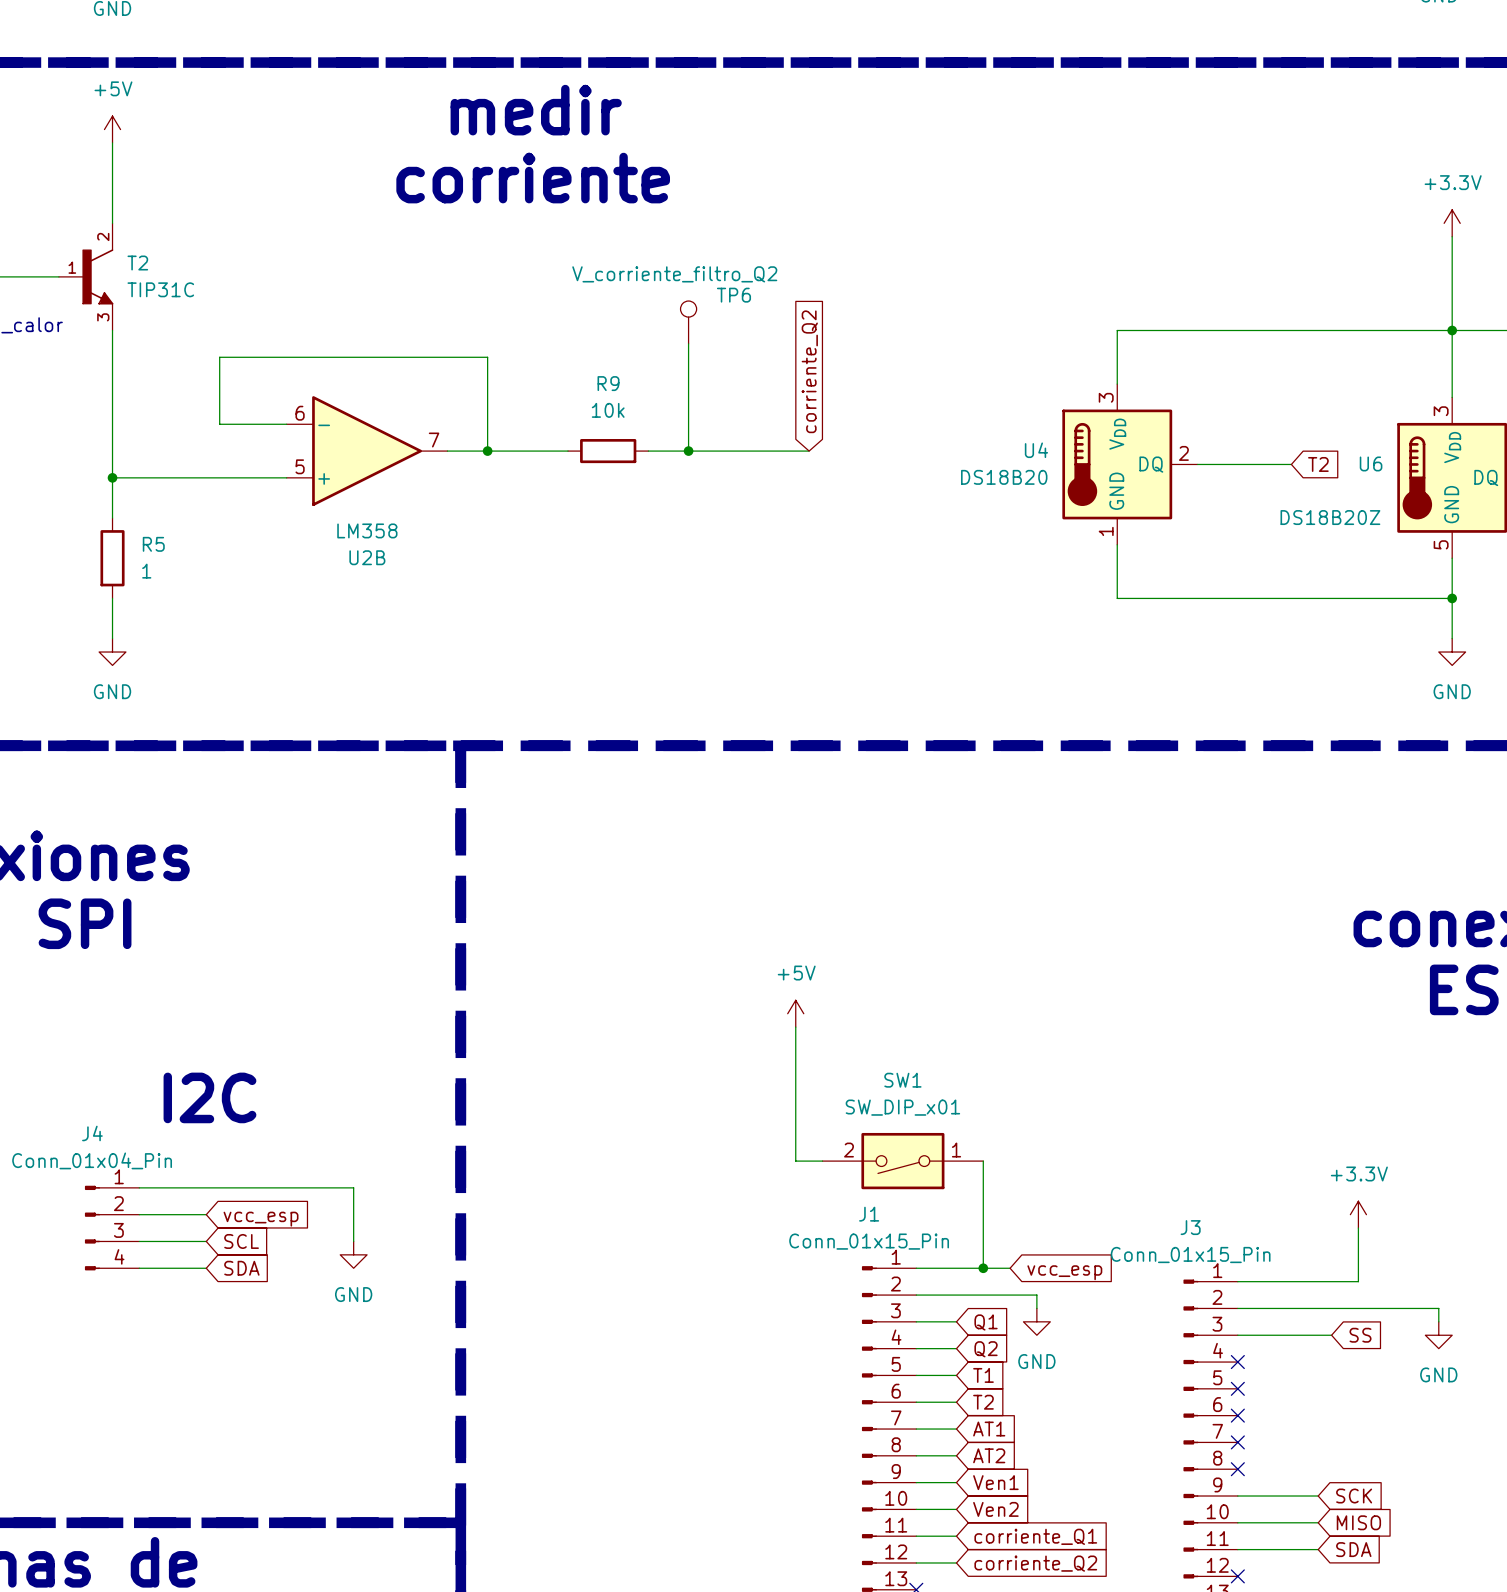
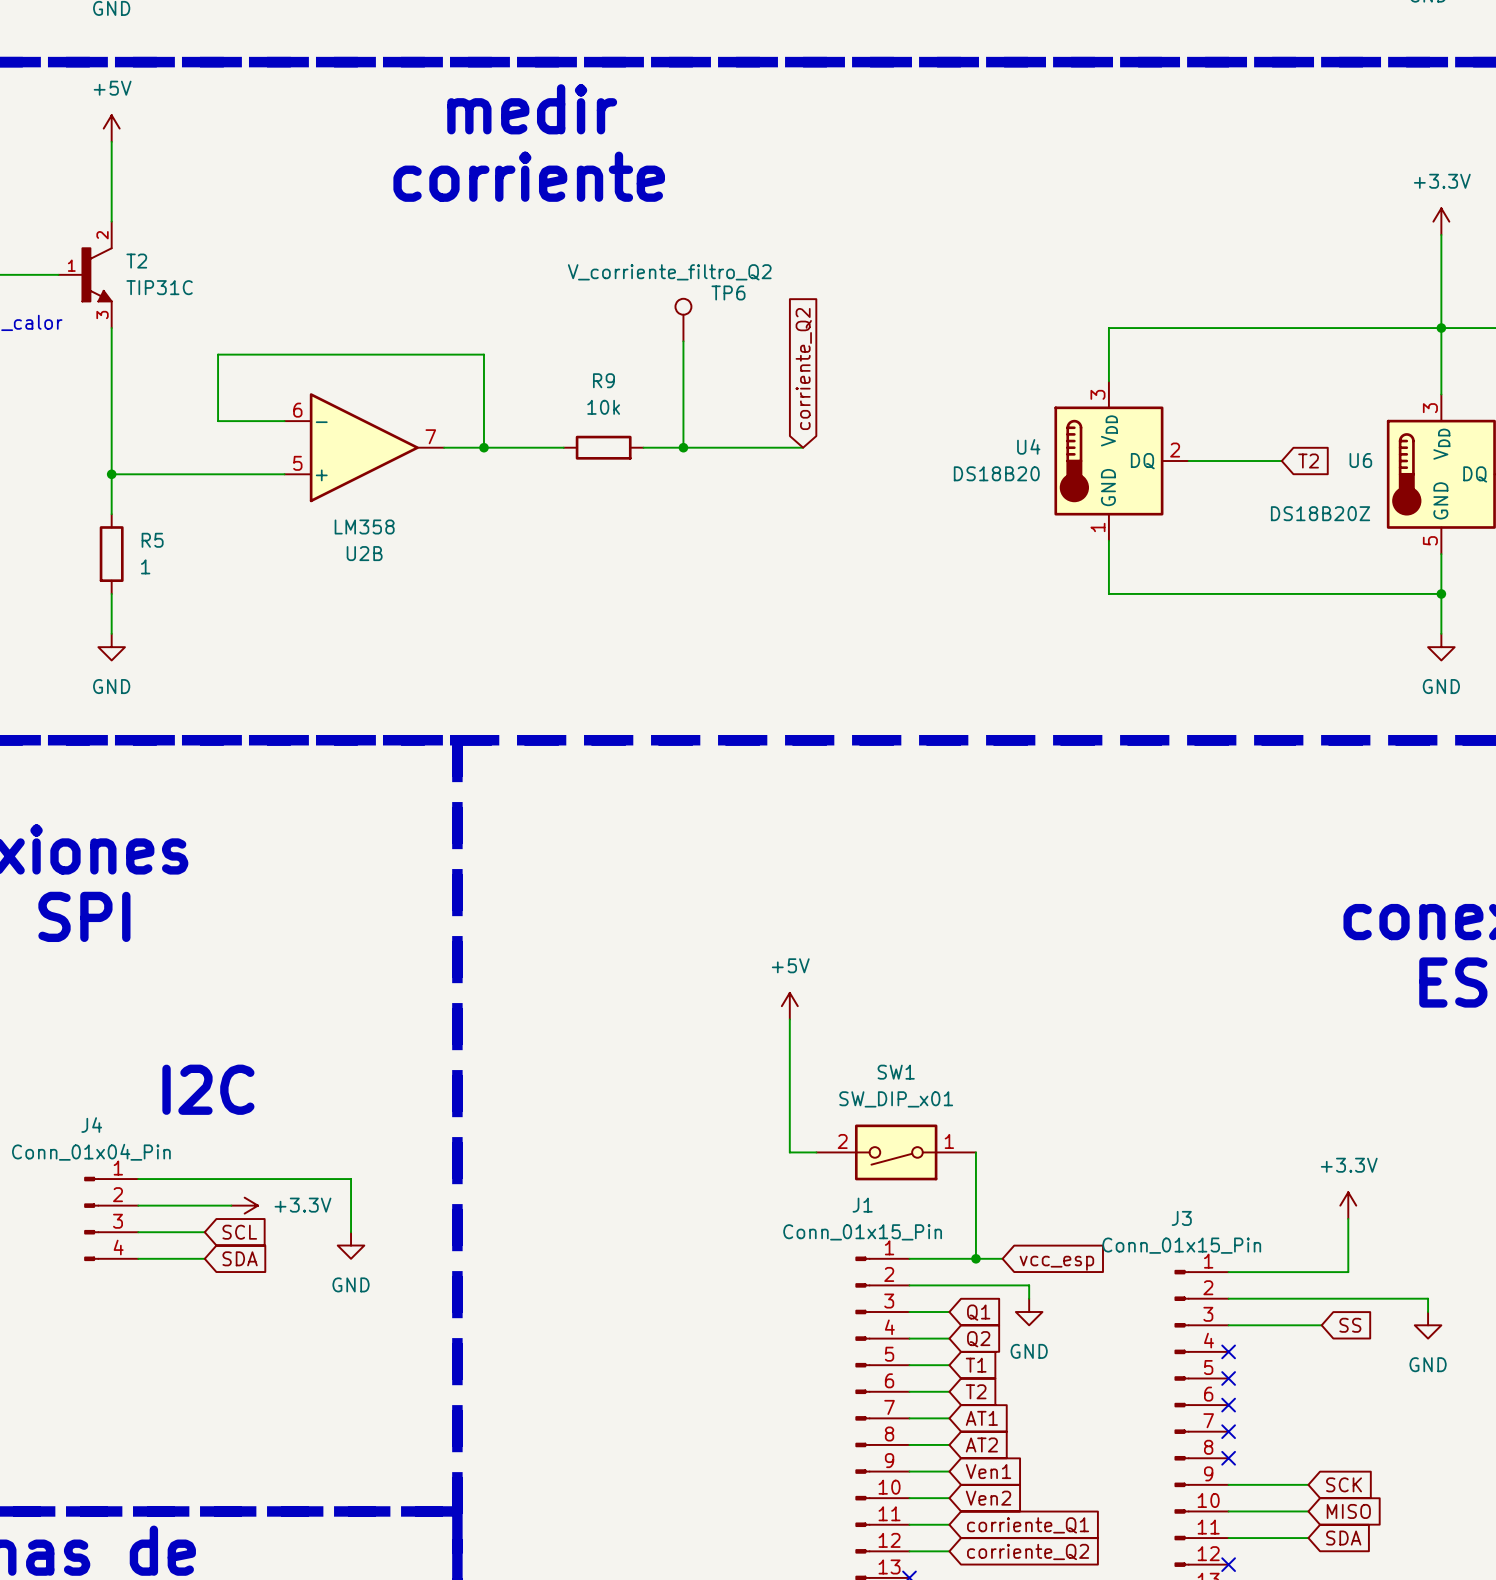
wire: none -> (204, 1205) (231, 1205)
power symbol: none -> +3.3V (244, 1205)
global label: vcc_esp (261, 1219) -> none

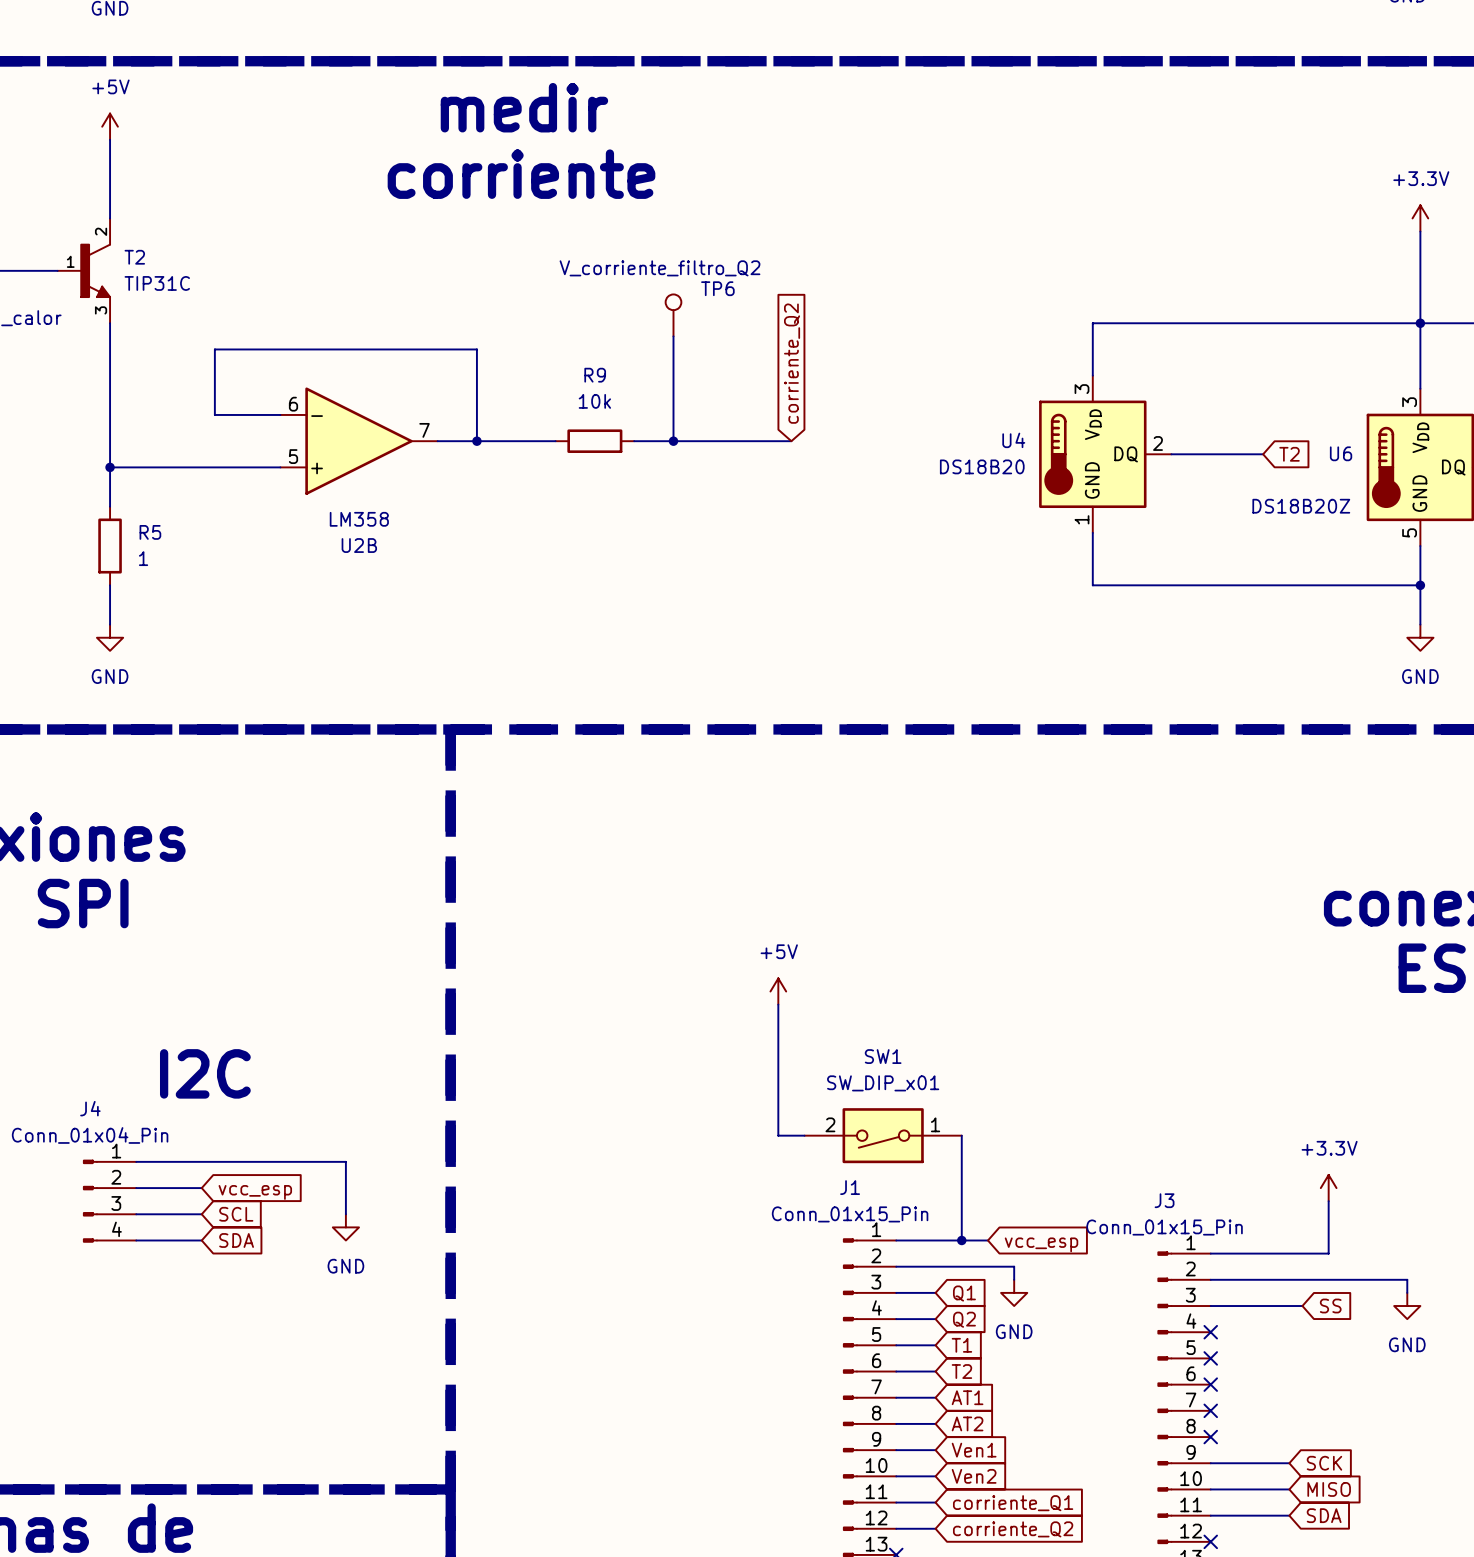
wire: (204, 1205) (231, 1205) -> none
power symbol: +3.3V (244, 1205) -> none
global label: none -> vcc_esp (255, 1192)

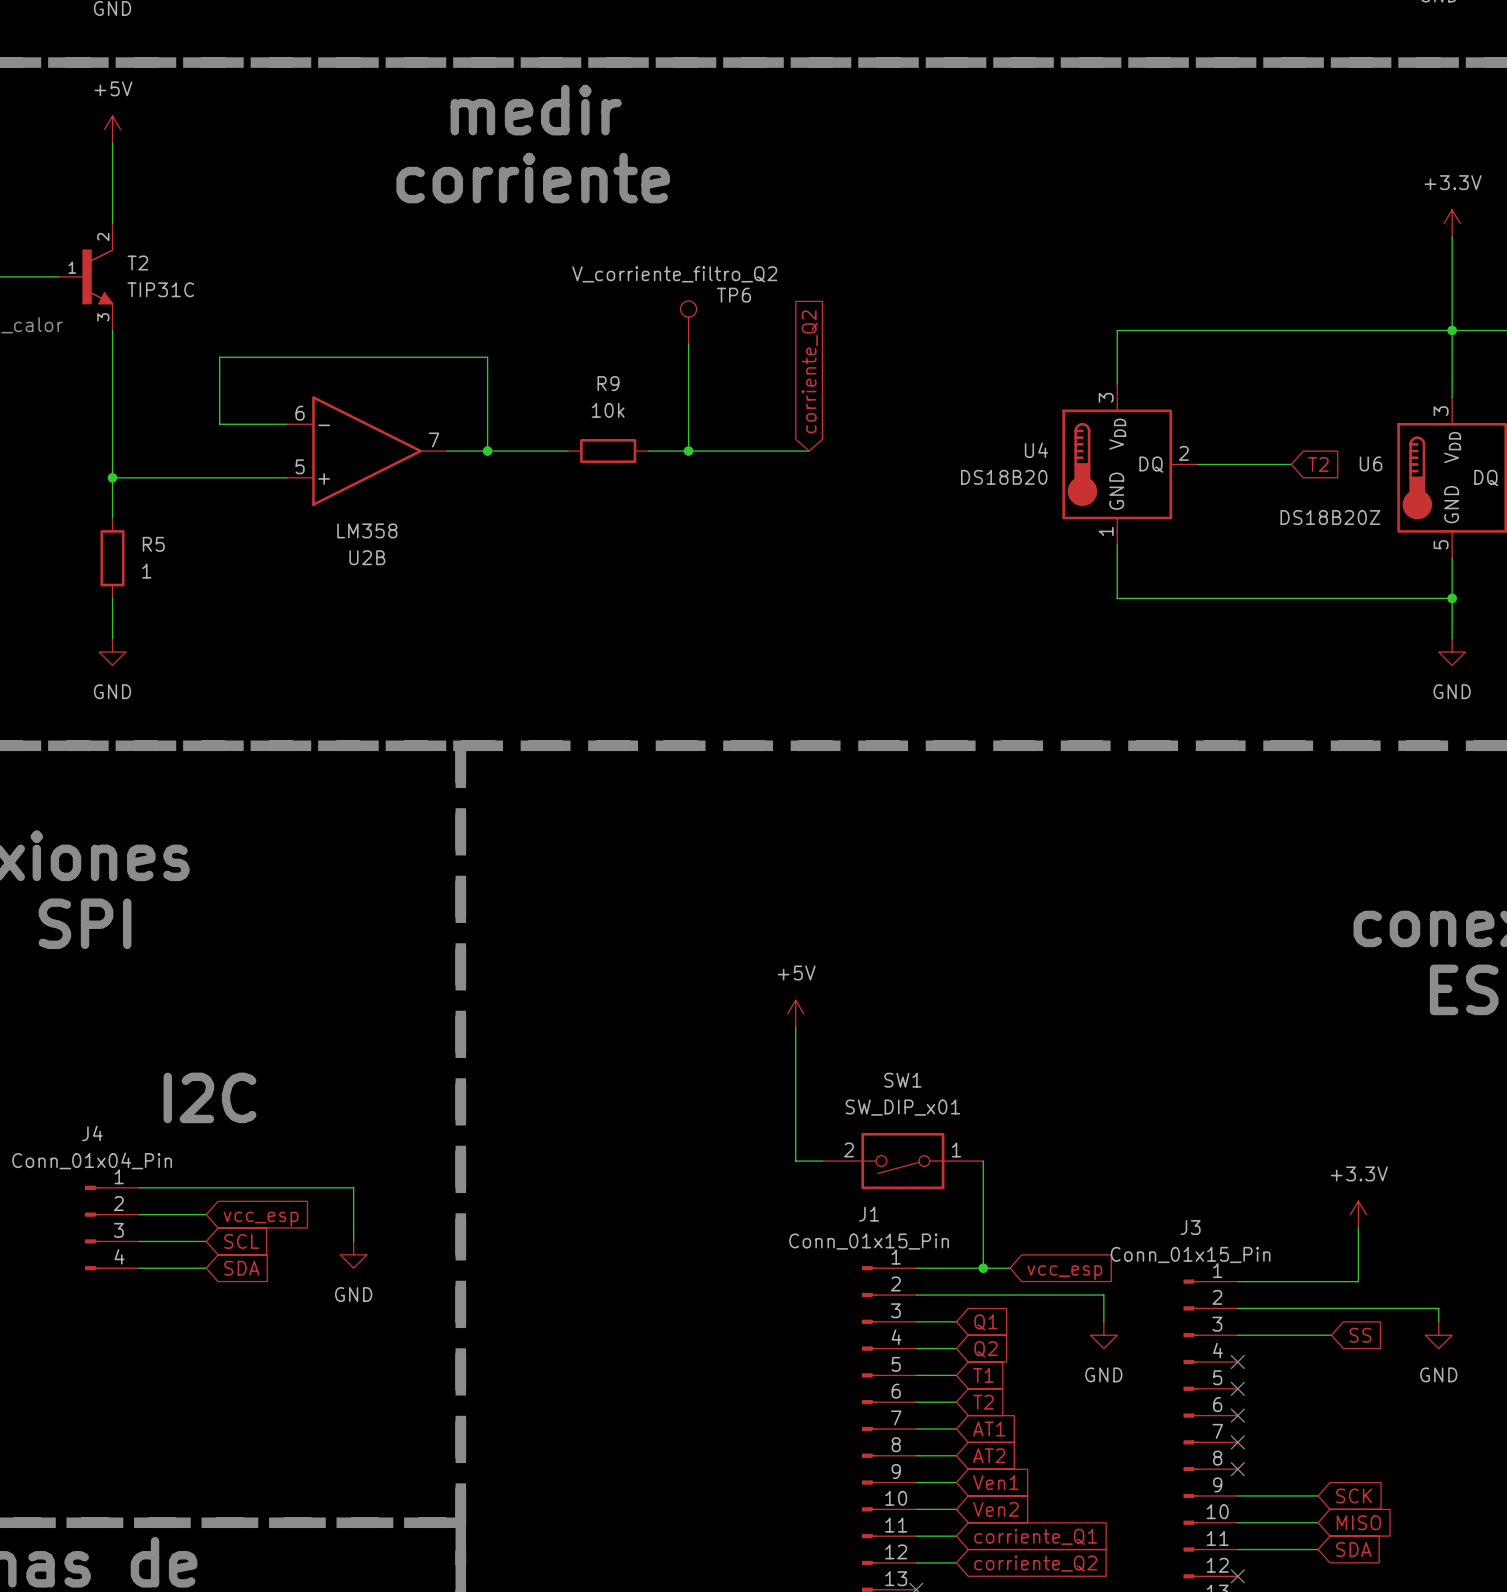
wire: (1014, 1266) (1014, 1279) -> (1036, 1295) (1103, 1295) (1103, 1321)
power symbol position: GND (1014, 1292) -> GND (1103, 1335)

